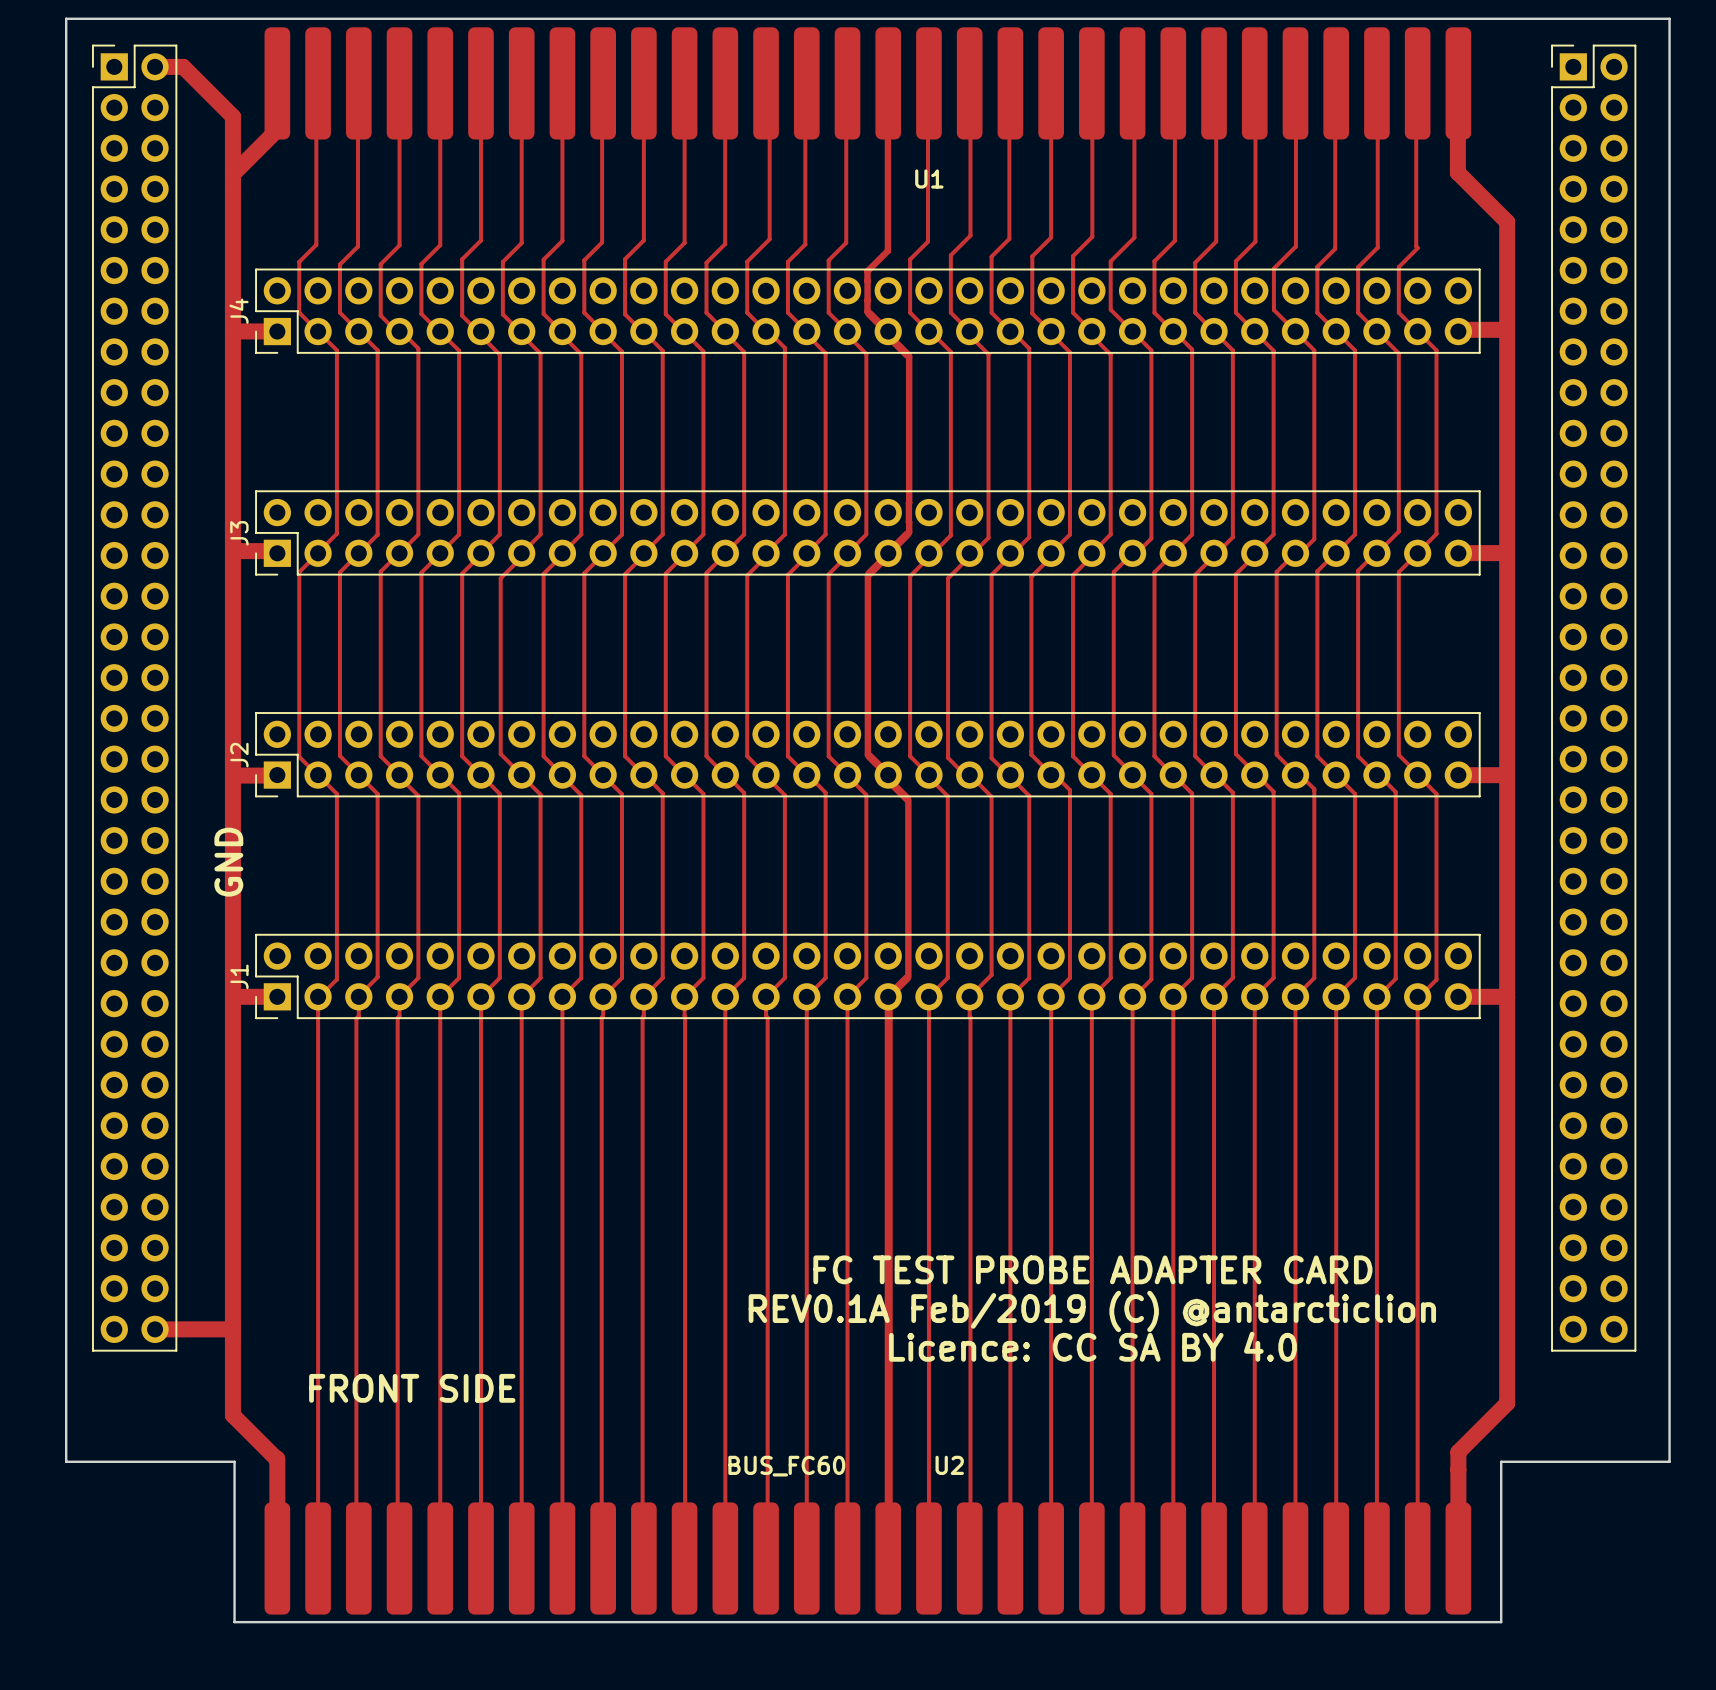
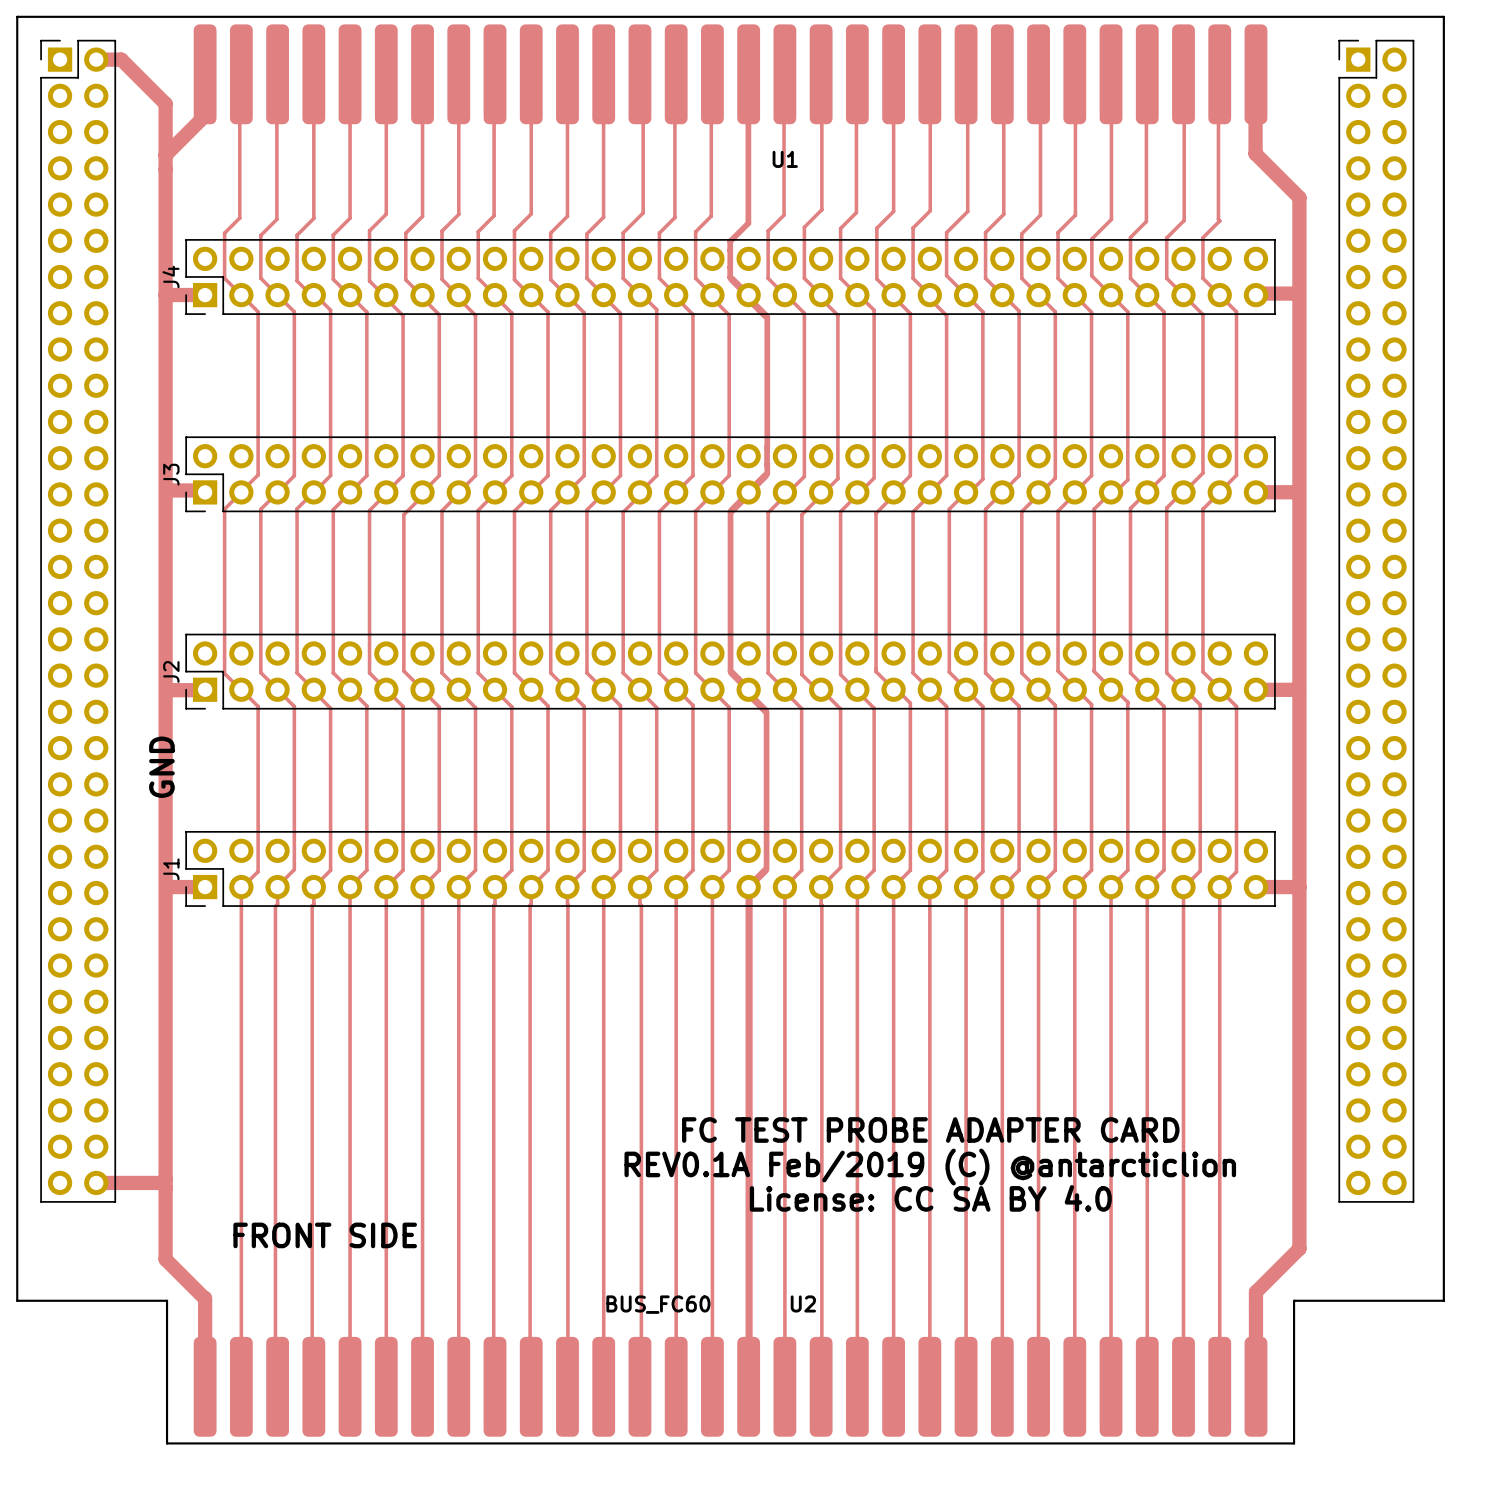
text: Licence: CC SA BY 4.0 (1092, 1346) -> License: CC SA BY 4.0 (930, 1198)

